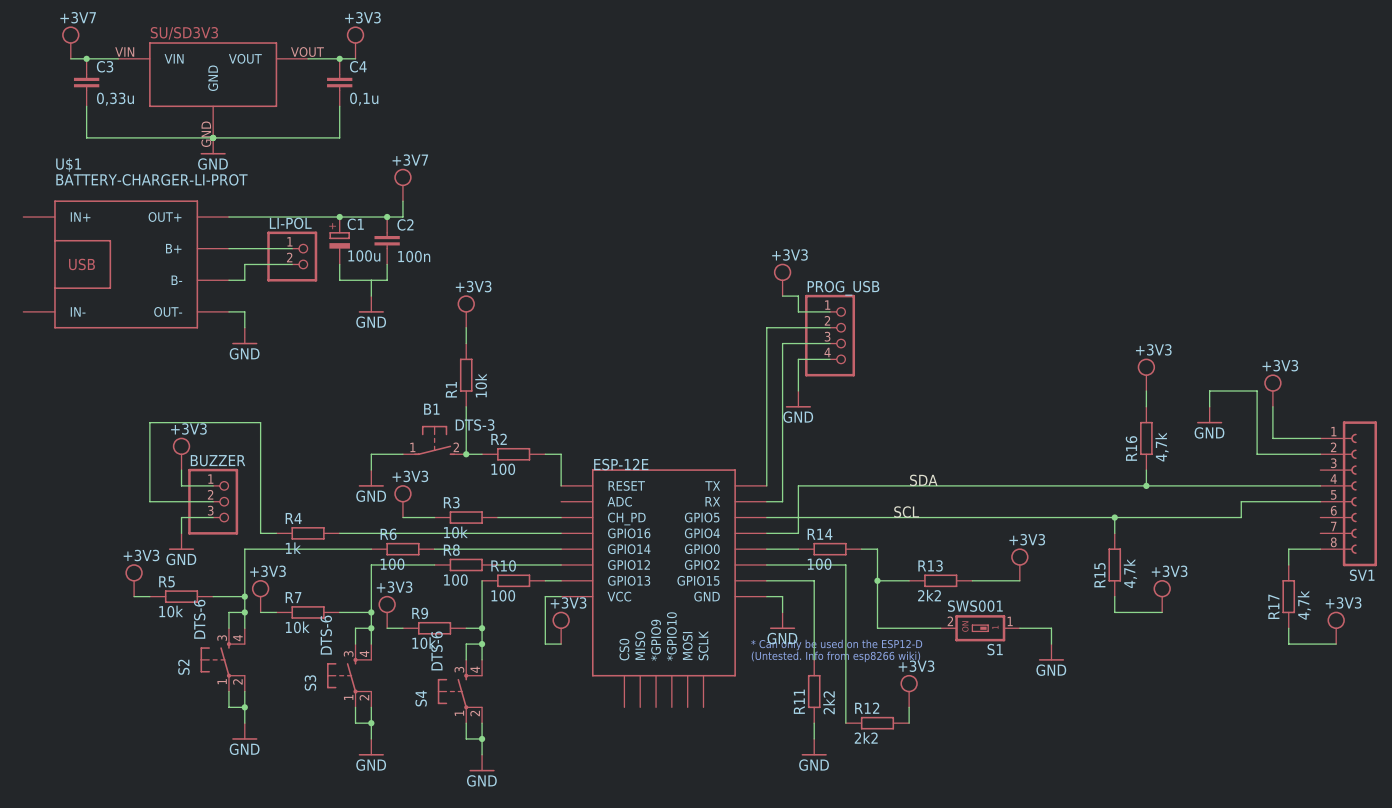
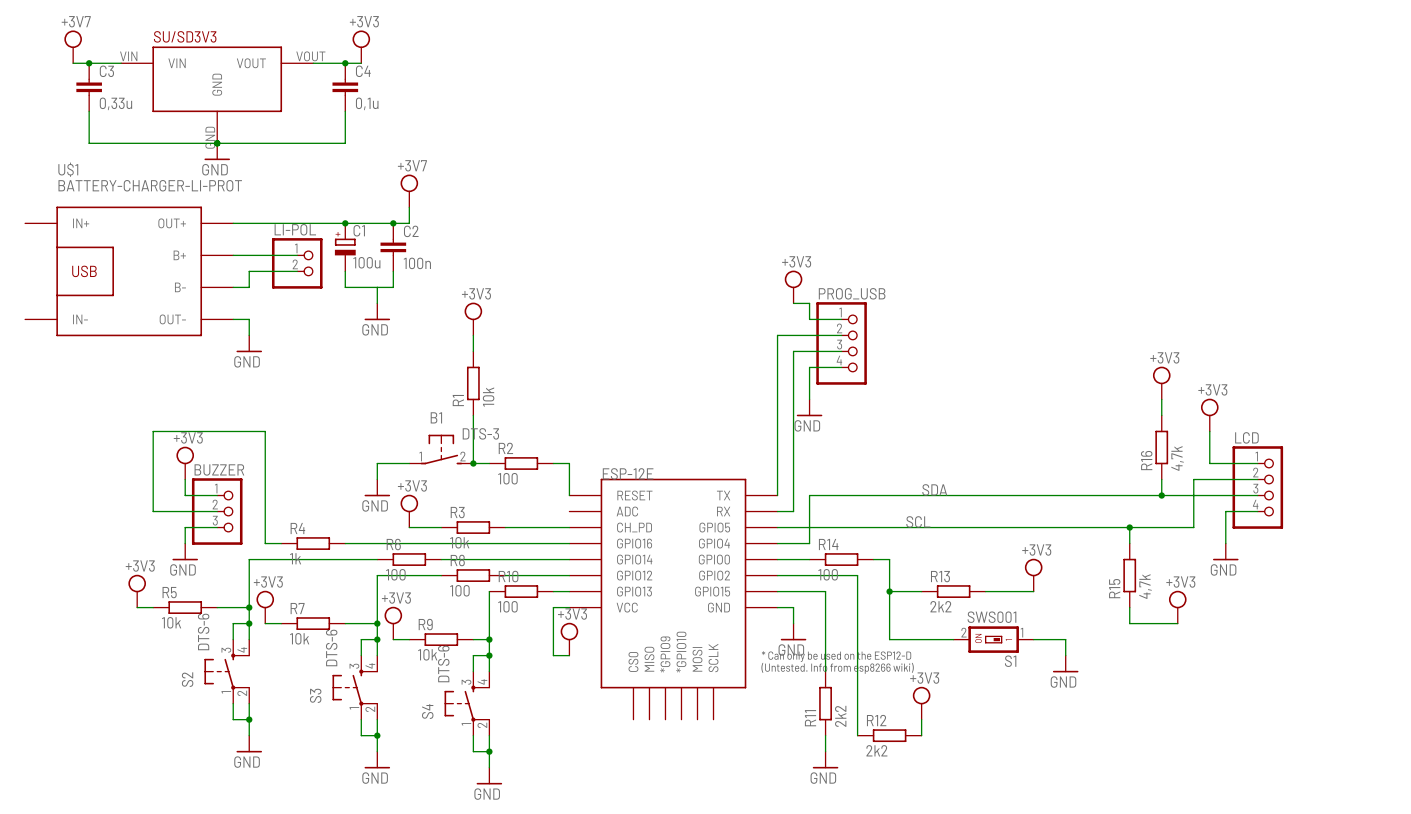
power symbol position: +3V3 (1272, 390) -> +3V3 (1209, 415)
wire: (1209, 406) (1209, 391) (1257, 391) (1257, 454) (1320, 454) -> none
wire: (1272, 406) (1272, 438) (1320, 438) -> (1209, 431) (1209, 463) (1257, 463)
power symbol position: GND (1209, 415) -> GND (1225, 551)
LCD: none -> (1257, 487)
wire: (1241, 485) (1320, 485) -> none
SV1: (1348, 493) -> none
wire: none -> (1257, 511) (1225, 511) (1225, 543)
wire: (1320, 501) (1241, 501) (1241, 517) (1178, 517) -> (1257, 479) (1193, 479) (1193, 527)
wire: (1320, 549) (1288, 549) (1288, 564) -> none
R17: 4,7k (1288, 596) -> none
power symbol: +3V3 (1336, 627) -> none
wire: (1288, 628) (1288, 644) (1336, 644) -> none

